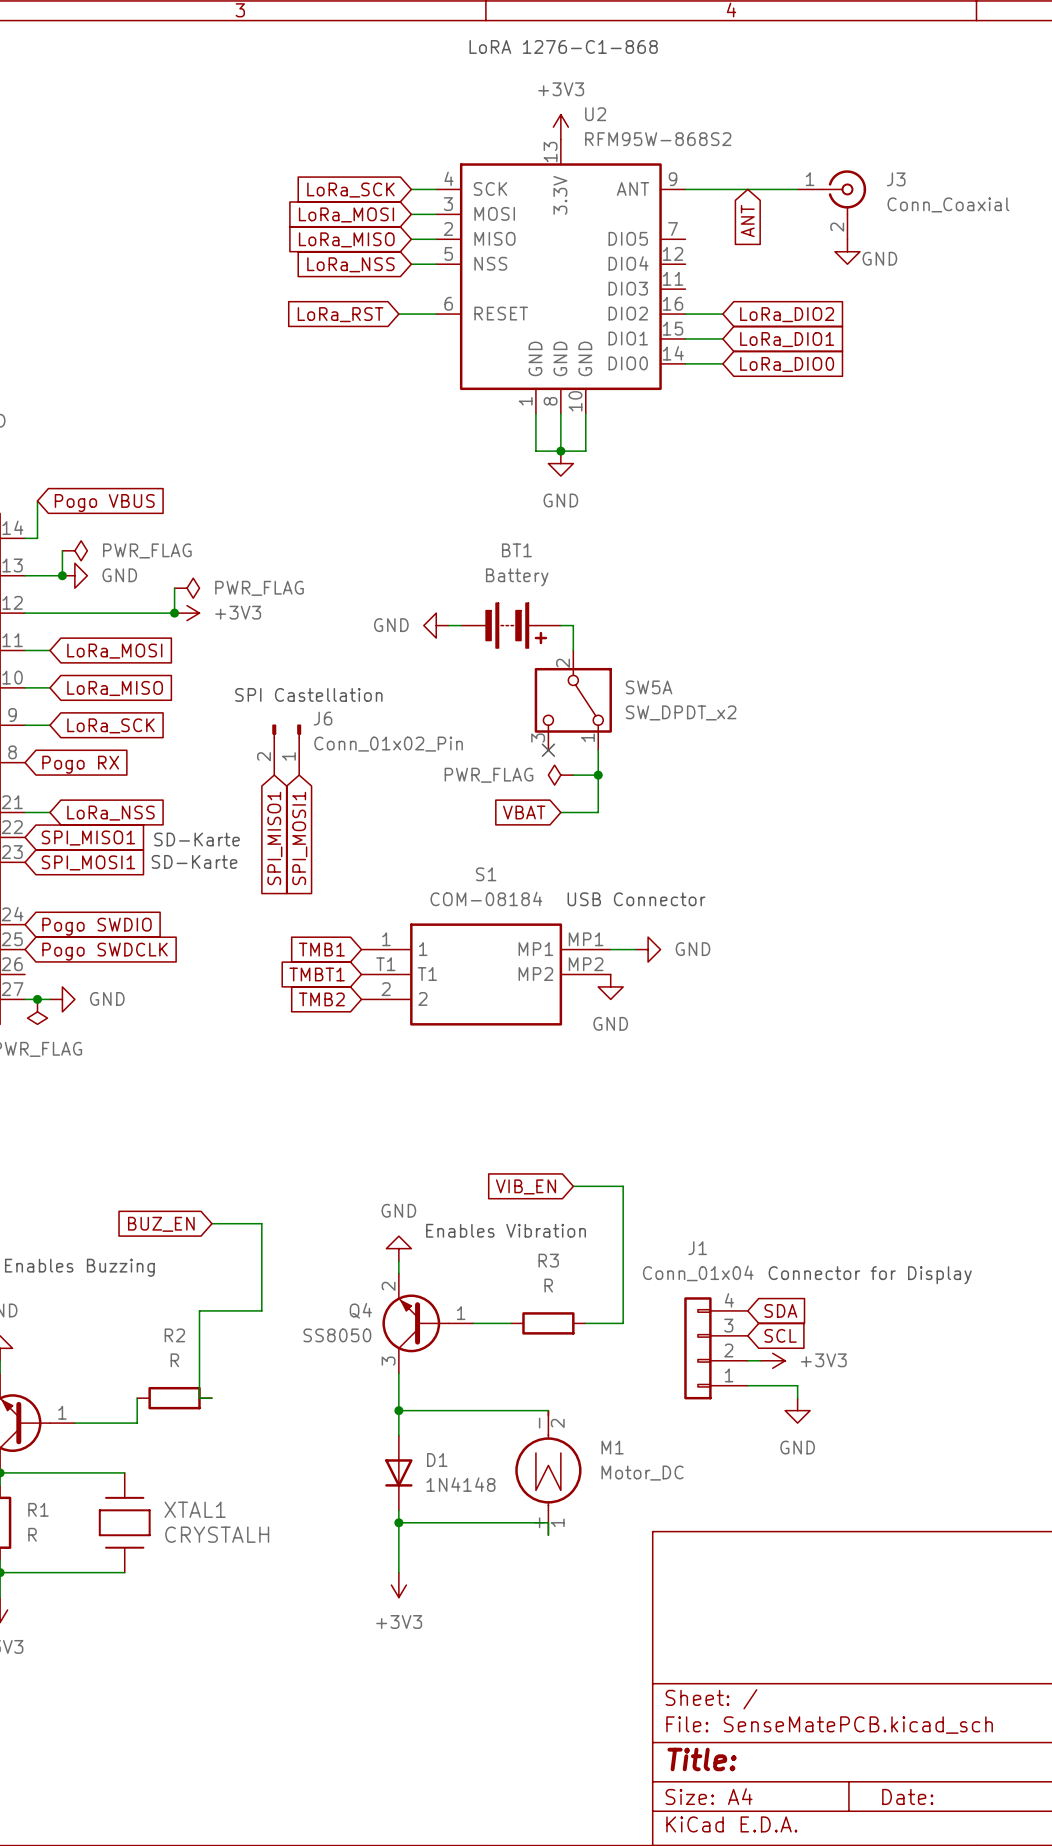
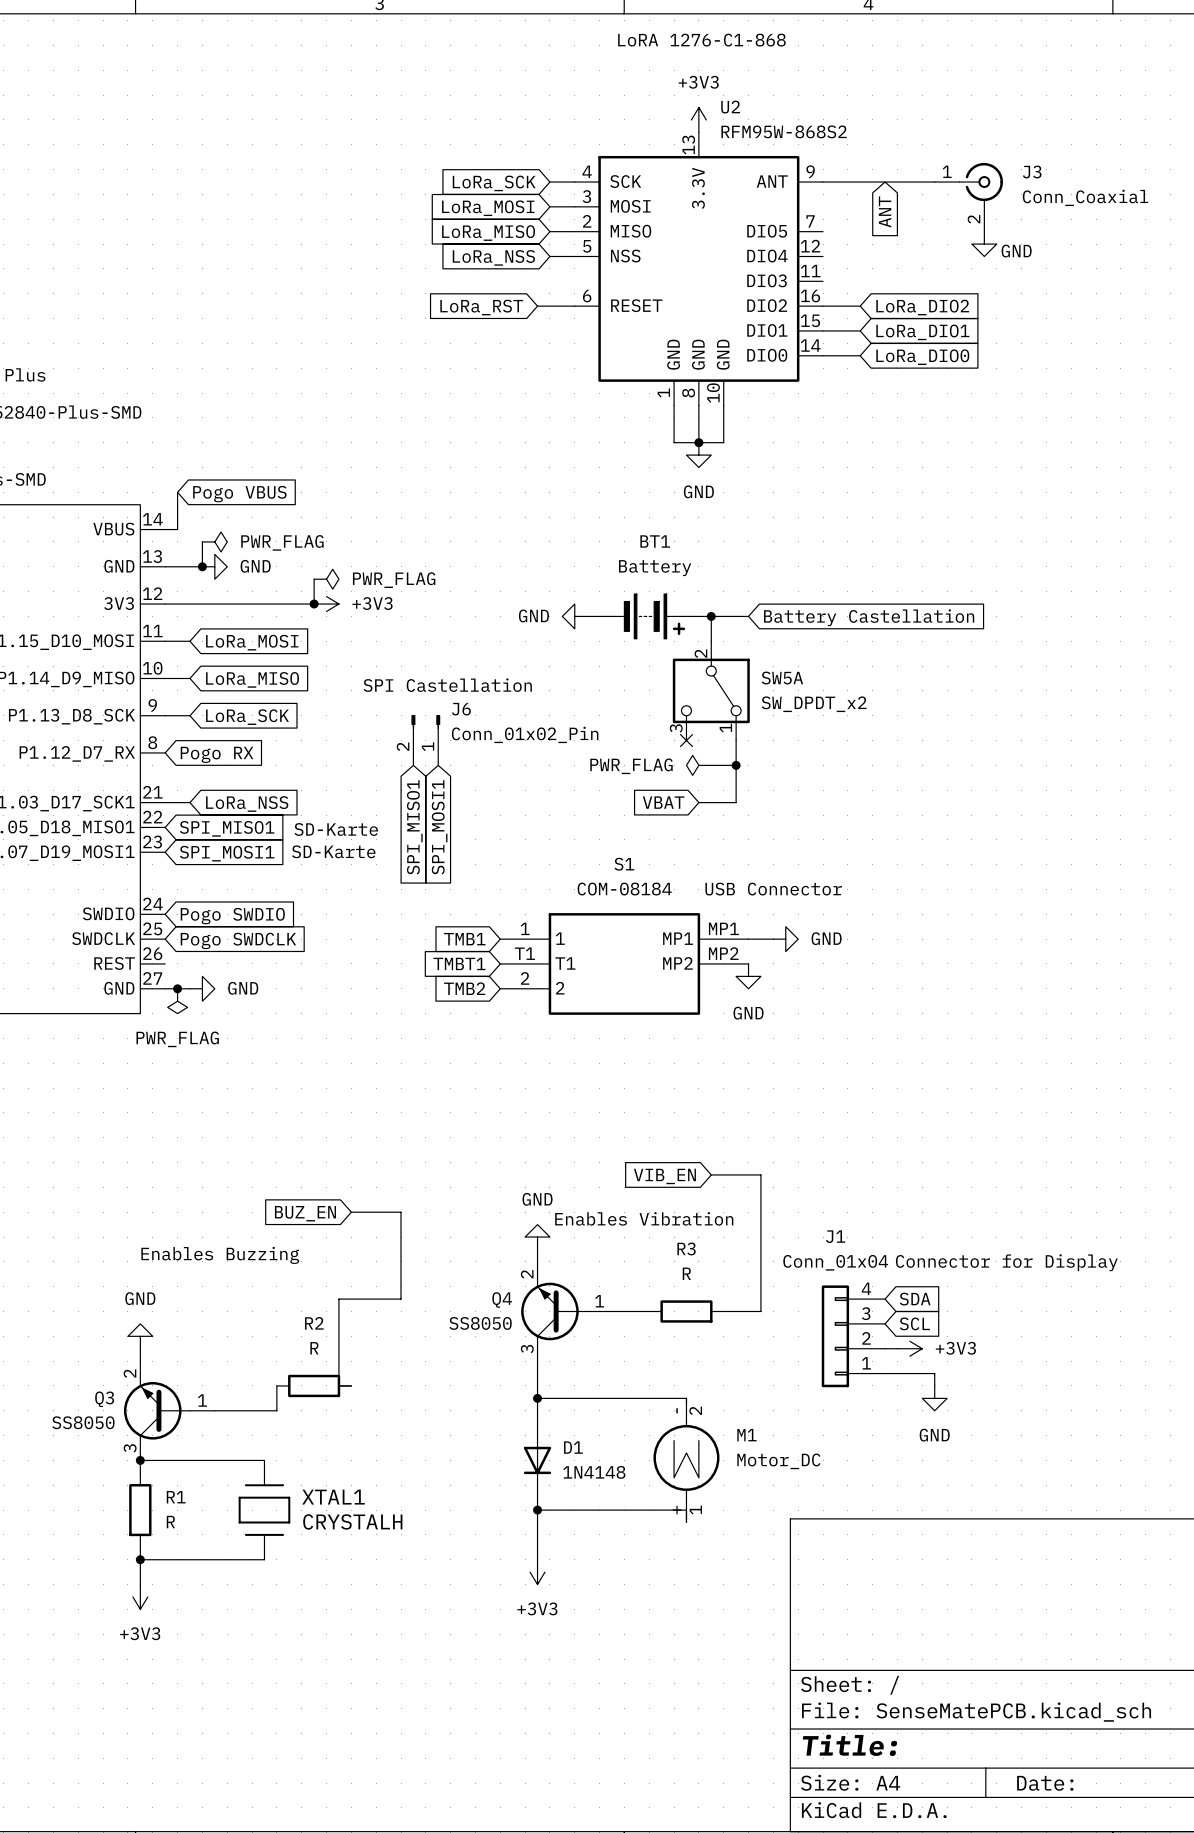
wire: none -> (711, 616) (748, 616)
junction: none -> (711, 616)
global label: none -> Battery Castellation (869, 617)

